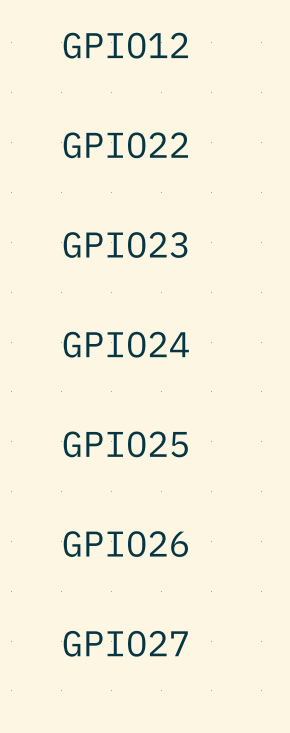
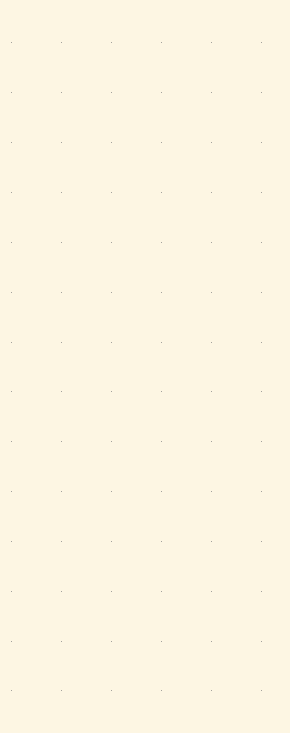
label: GPIO12 (125, 45) -> none
label: GPIO22 (125, 145) -> none
label: GPIO23 (125, 245) -> none
label: GPIO24 (126, 344) -> none
label: GPIO25 (125, 444) -> none
label: GPIO26 (125, 544) -> none
label: GPIO27 (125, 643) -> none

